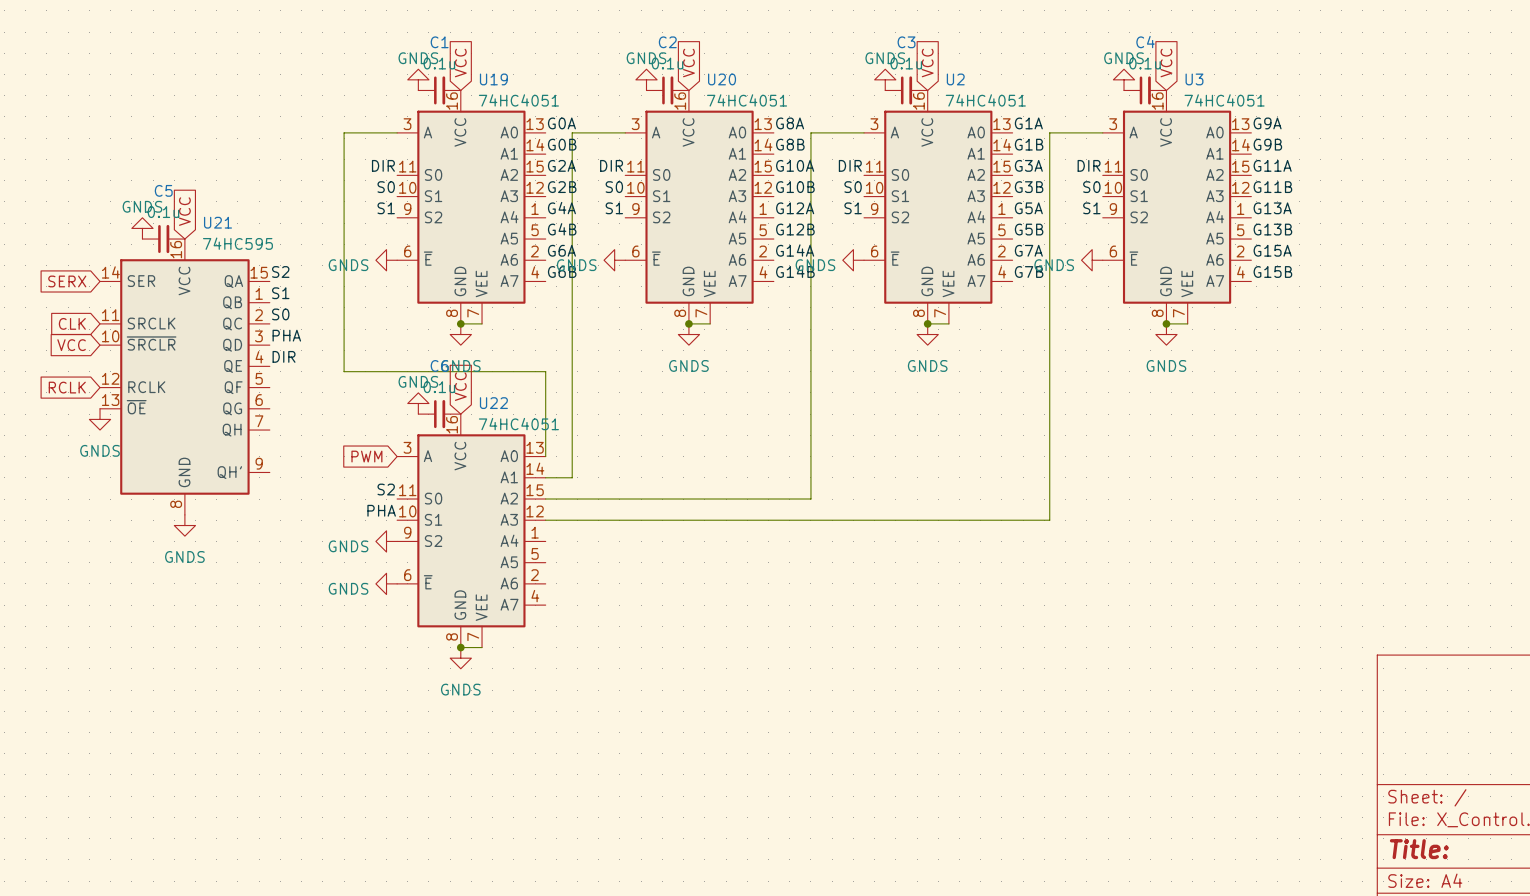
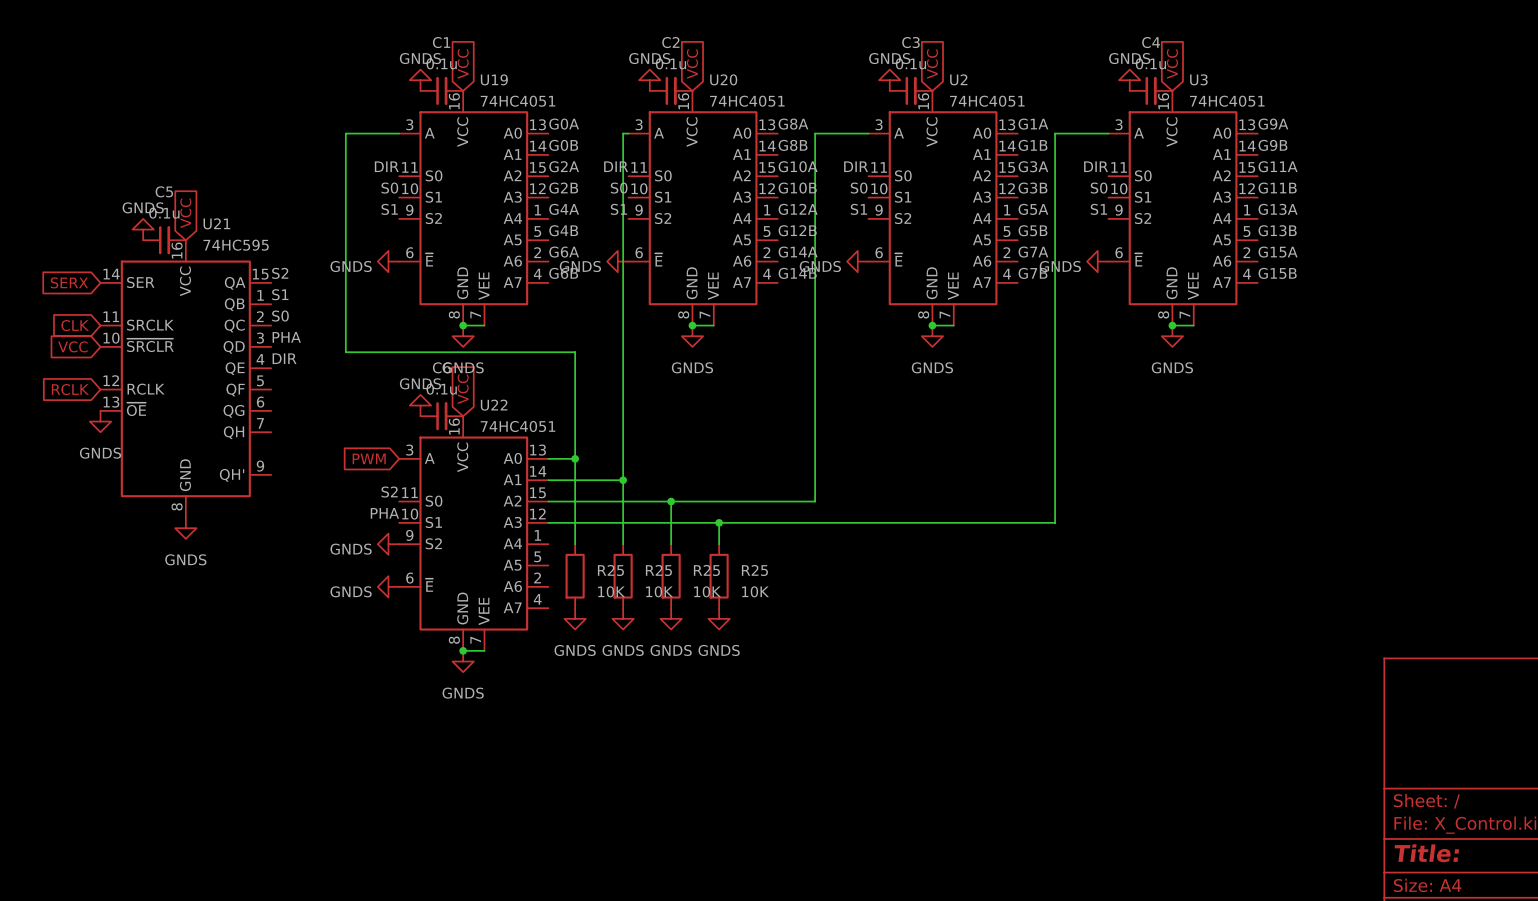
wire: (619, 132) (572, 132) (572, 350) -> (623, 133) (623, 544)
wire: (344, 350) (344, 371) (545, 371) (545, 456) -> (345, 352) (575, 352)
wire: none -> (548, 458) (575, 458)
junction: none -> (575, 458)
wire: none -> (623, 480) (575, 480) (575, 544)
junction: none -> (623, 480)
wire: none -> (671, 501) (671, 544)
junction: none -> (671, 501)
wire: none -> (719, 522) (719, 544)
junction: none -> (719, 522)
R25: none -> 10K (575, 576)
R25: none -> 10K (623, 576)
R25: none -> 10K (671, 576)
R25: none -> 10K (719, 576)
power symbol: none -> GNDS (575, 618)
power symbol: none -> GNDS (623, 618)
power symbol: none -> GNDS (671, 618)
power symbol: none -> GNDS (719, 618)

